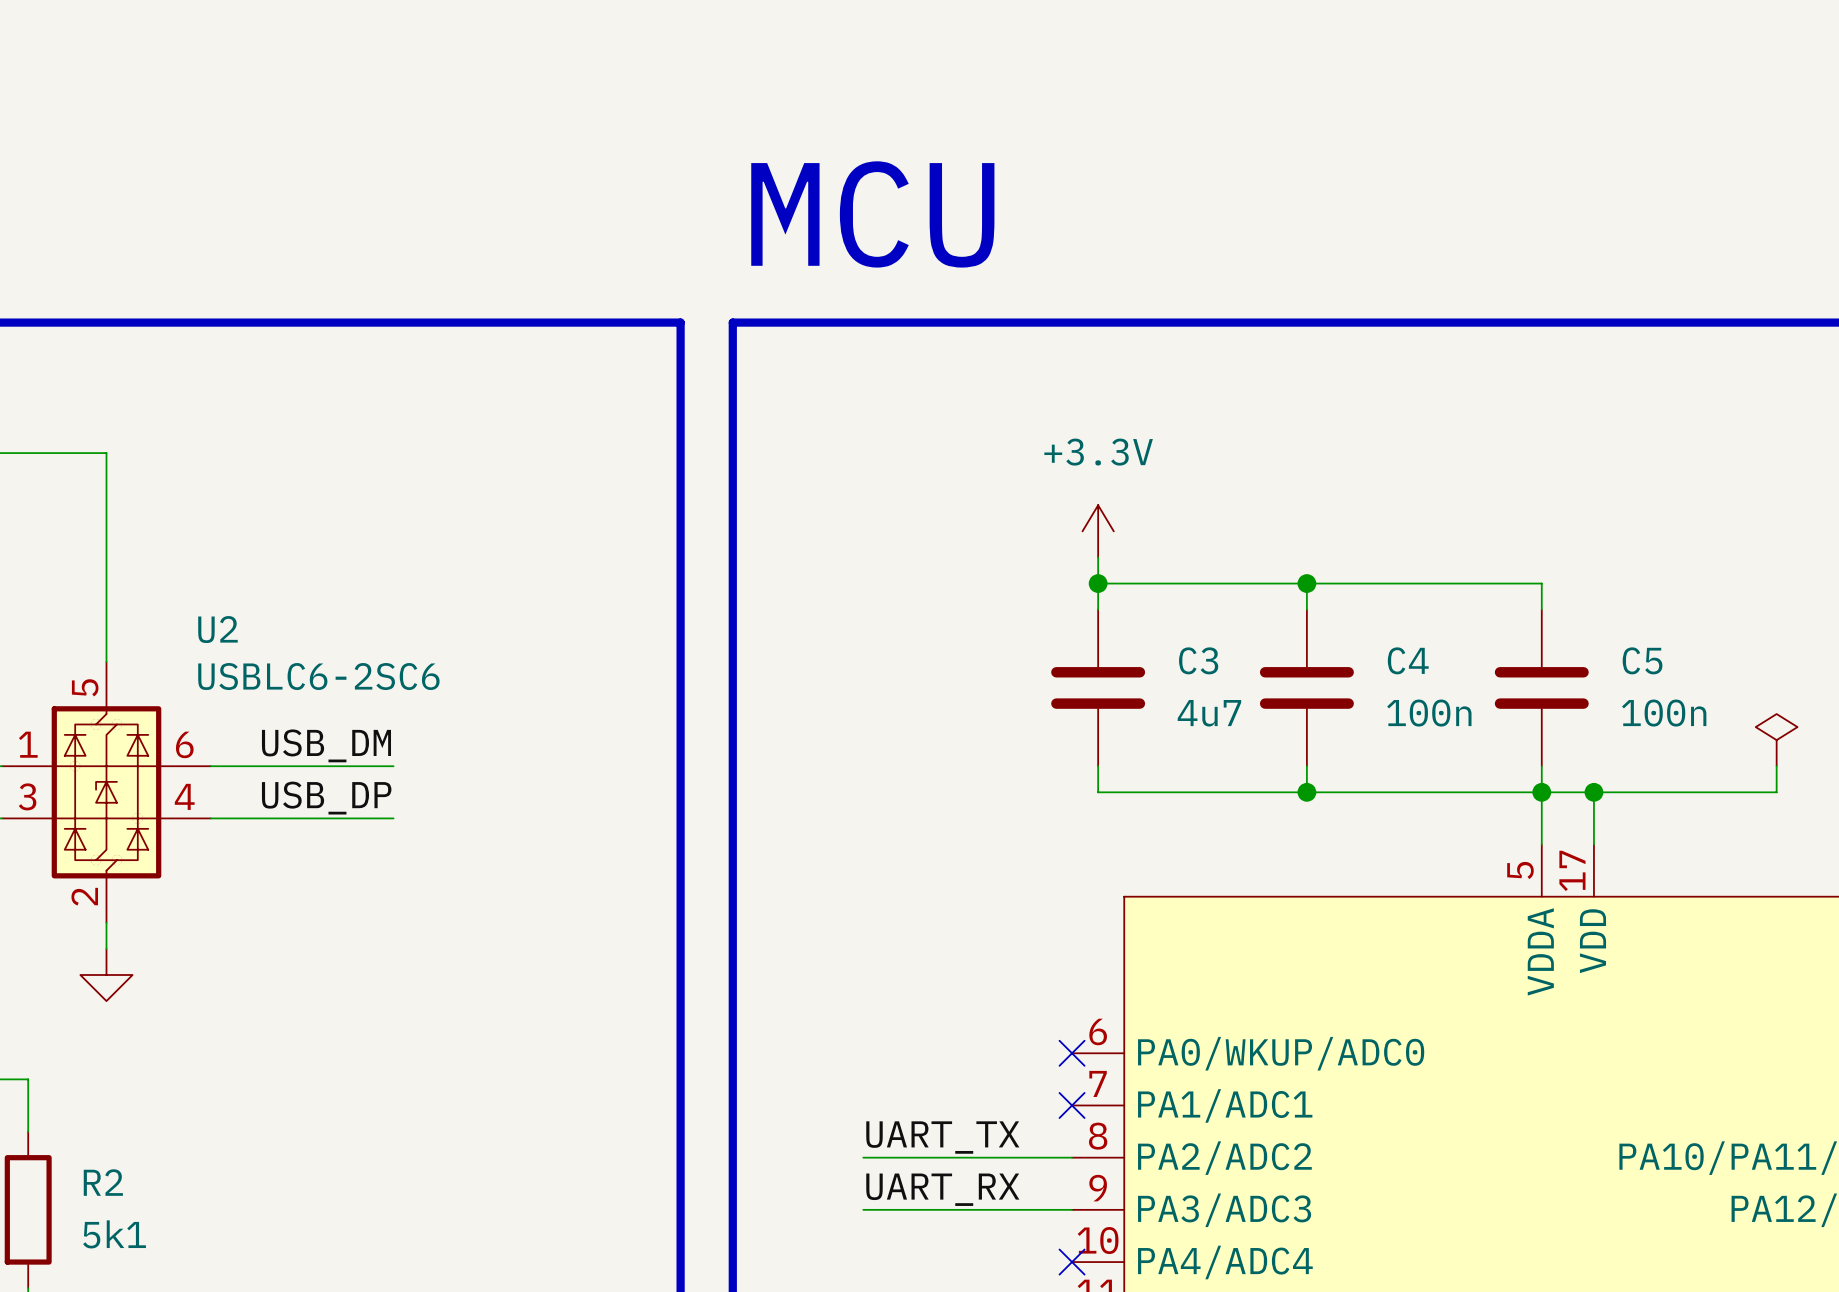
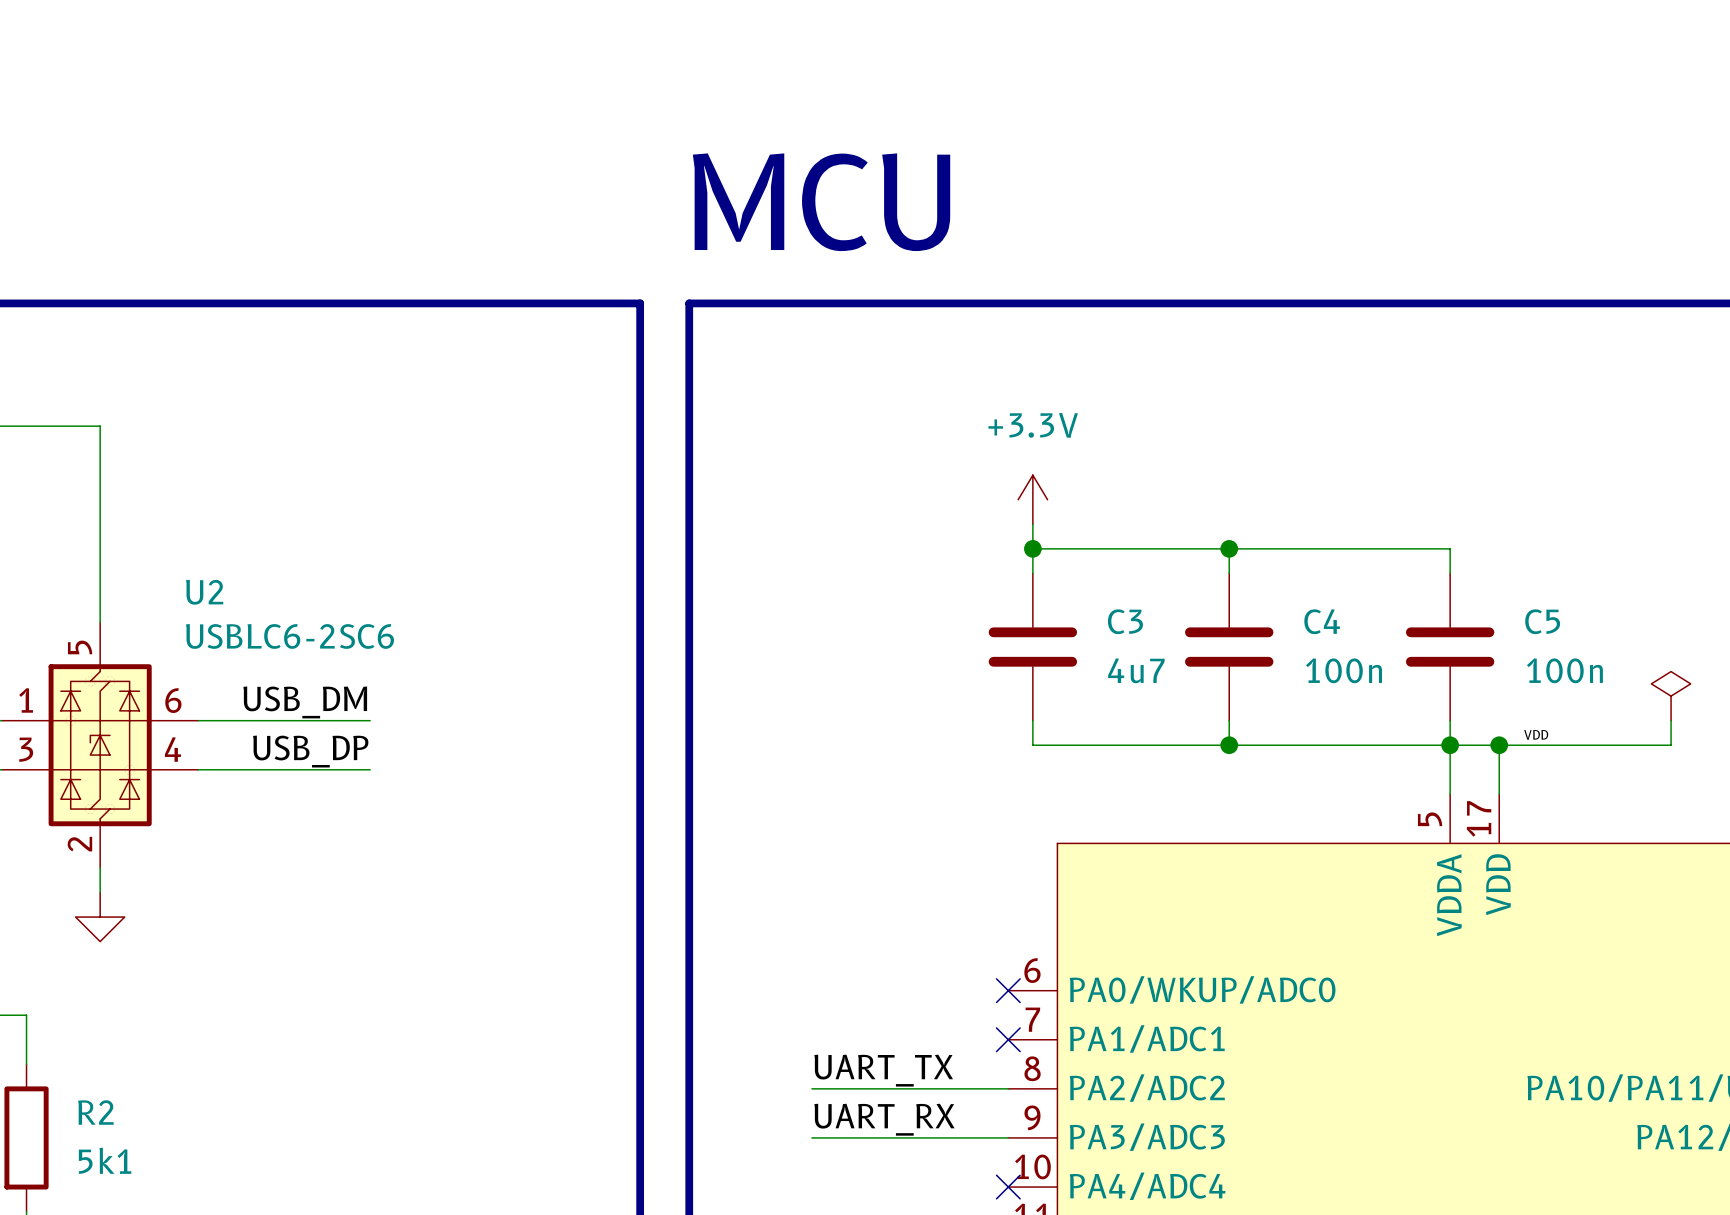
label: none -> VDD (1536, 734)

